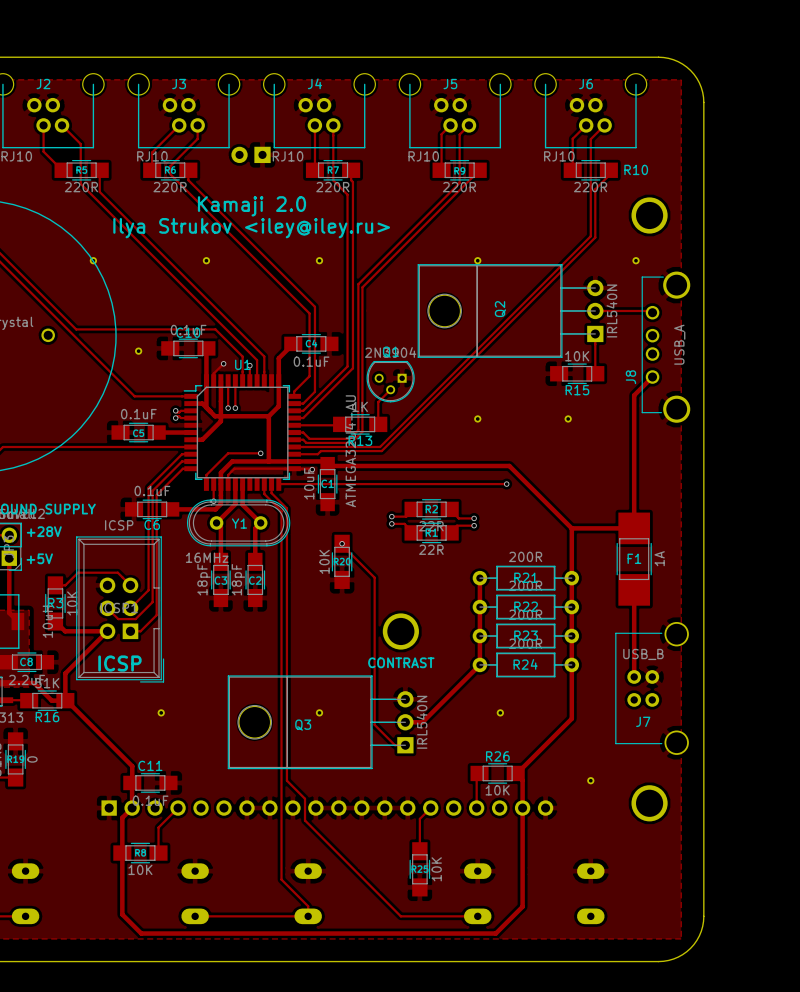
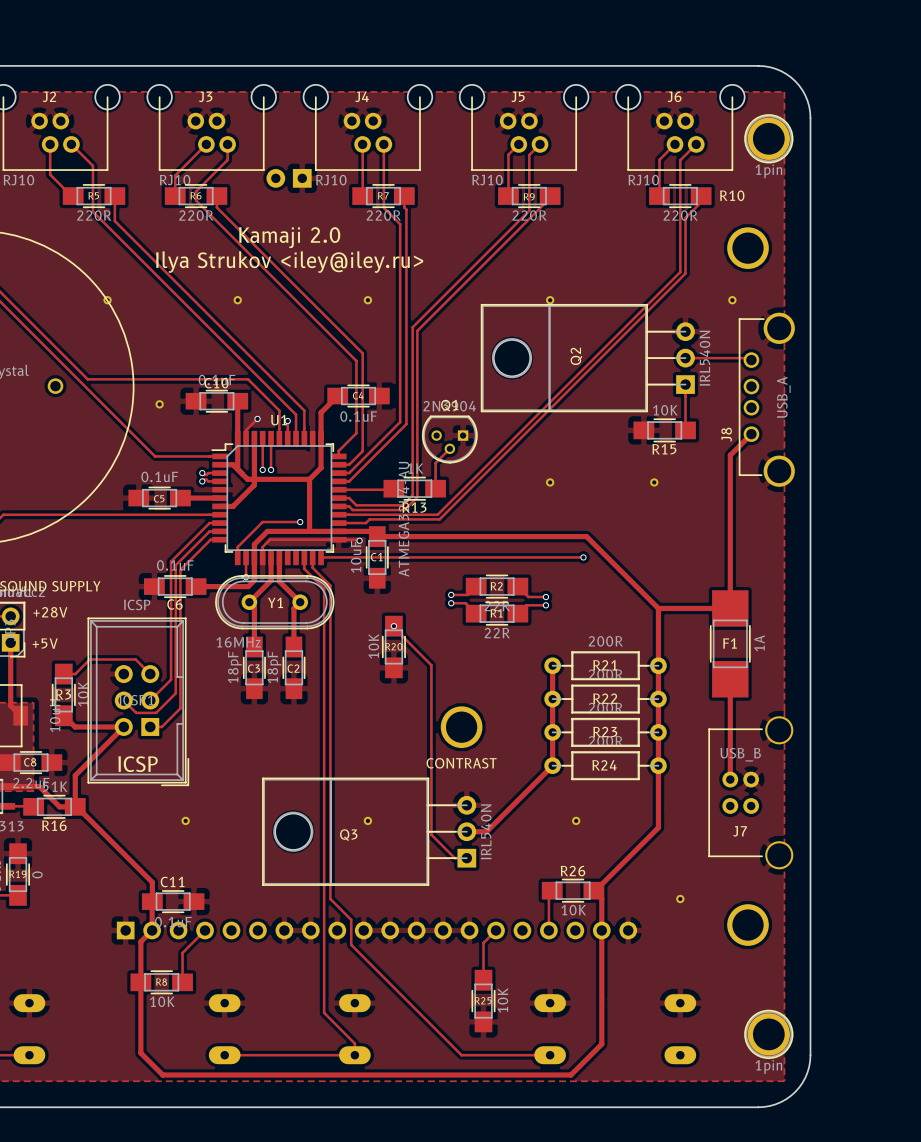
part: none -> 1pin (768, 138)
part: none -> 1pin (768, 1034)

